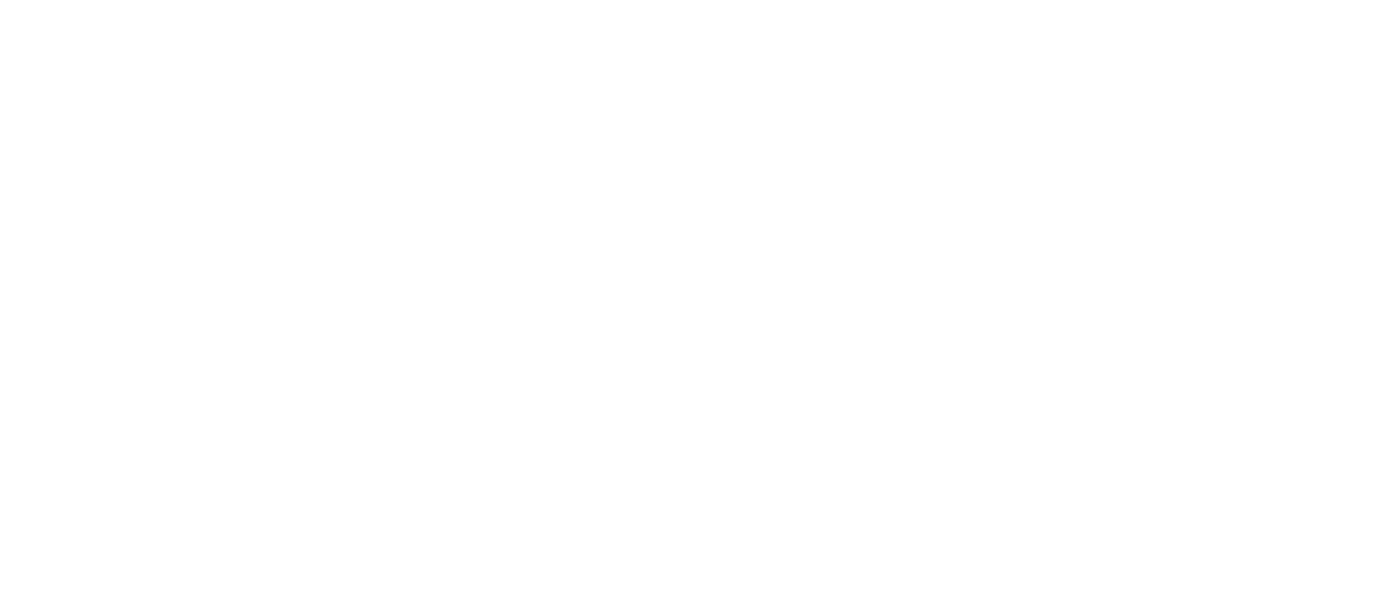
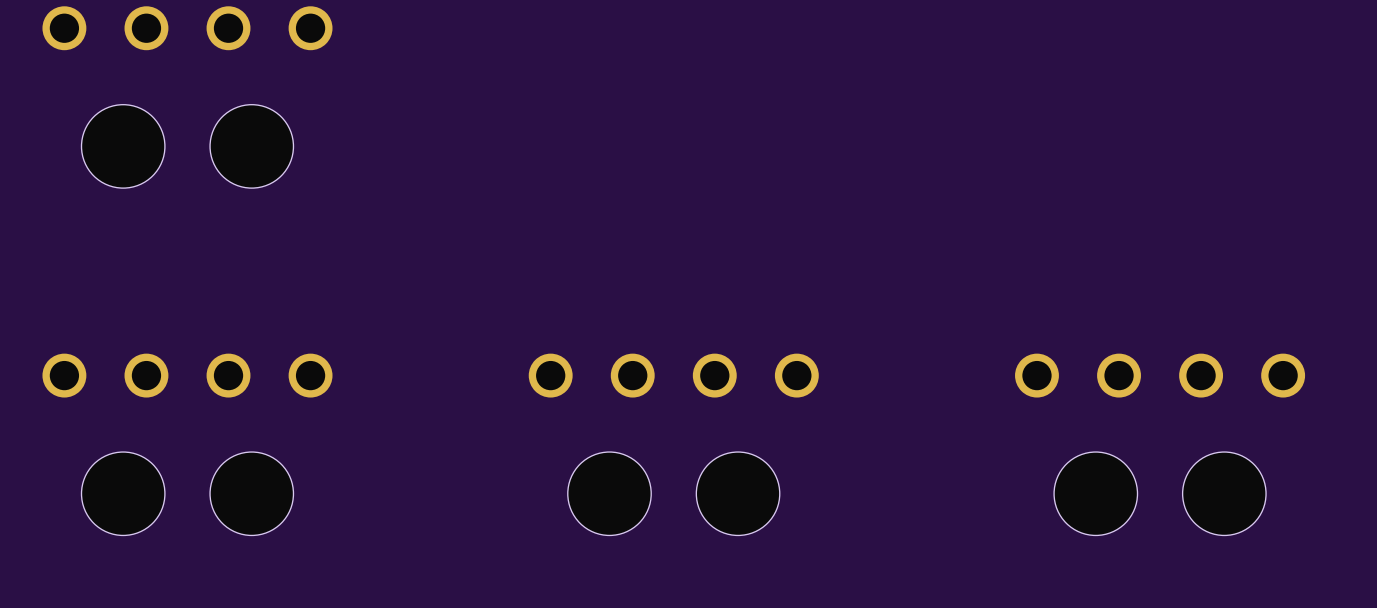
part: none -> (187, 97)
part: none -> (187, 444)
part: none -> (673, 444)
part: none -> (1160, 444)

